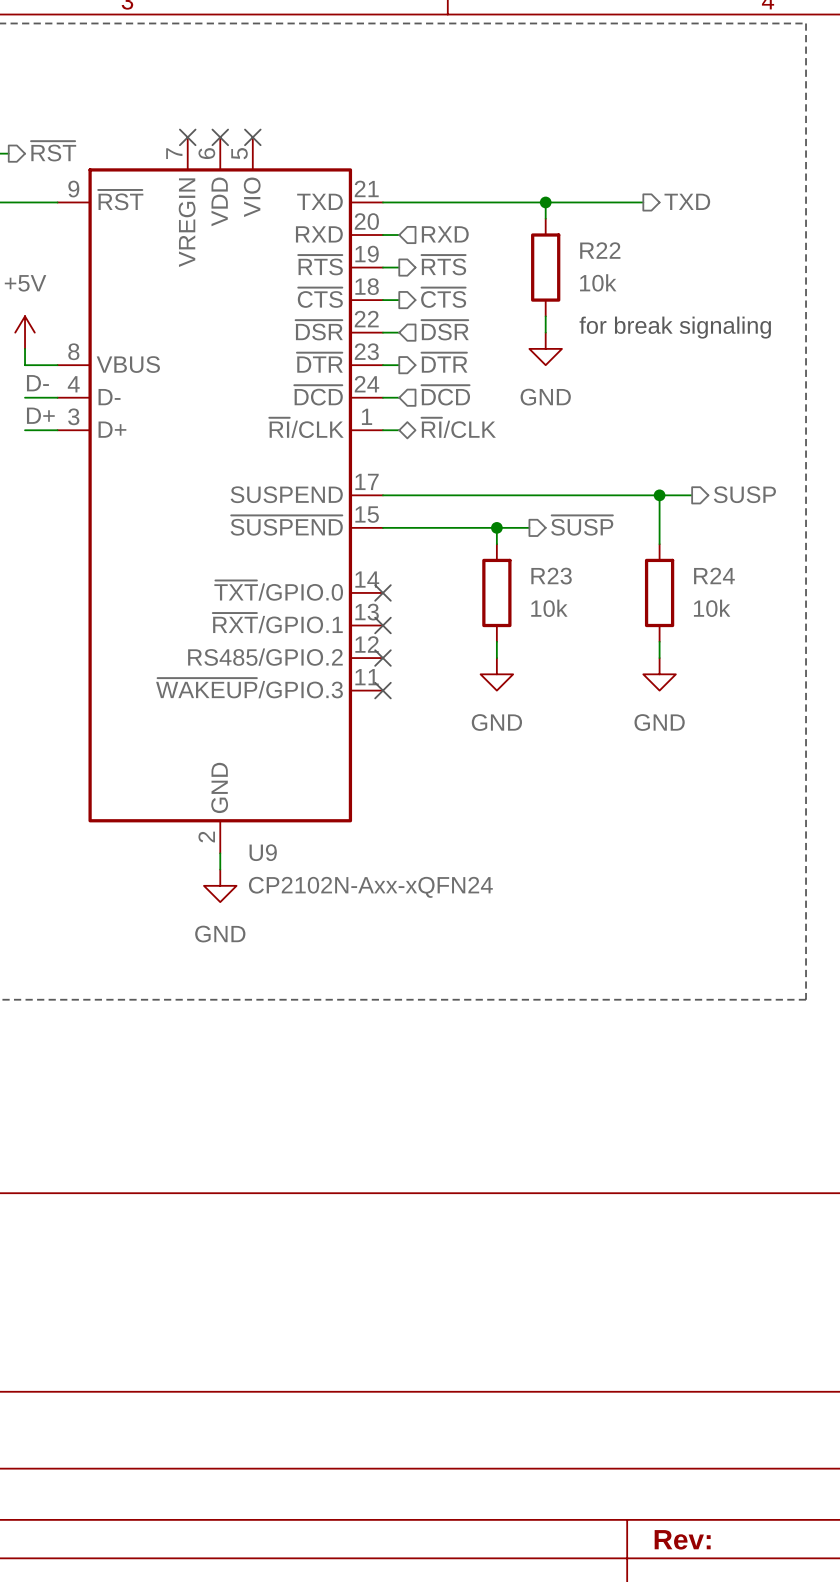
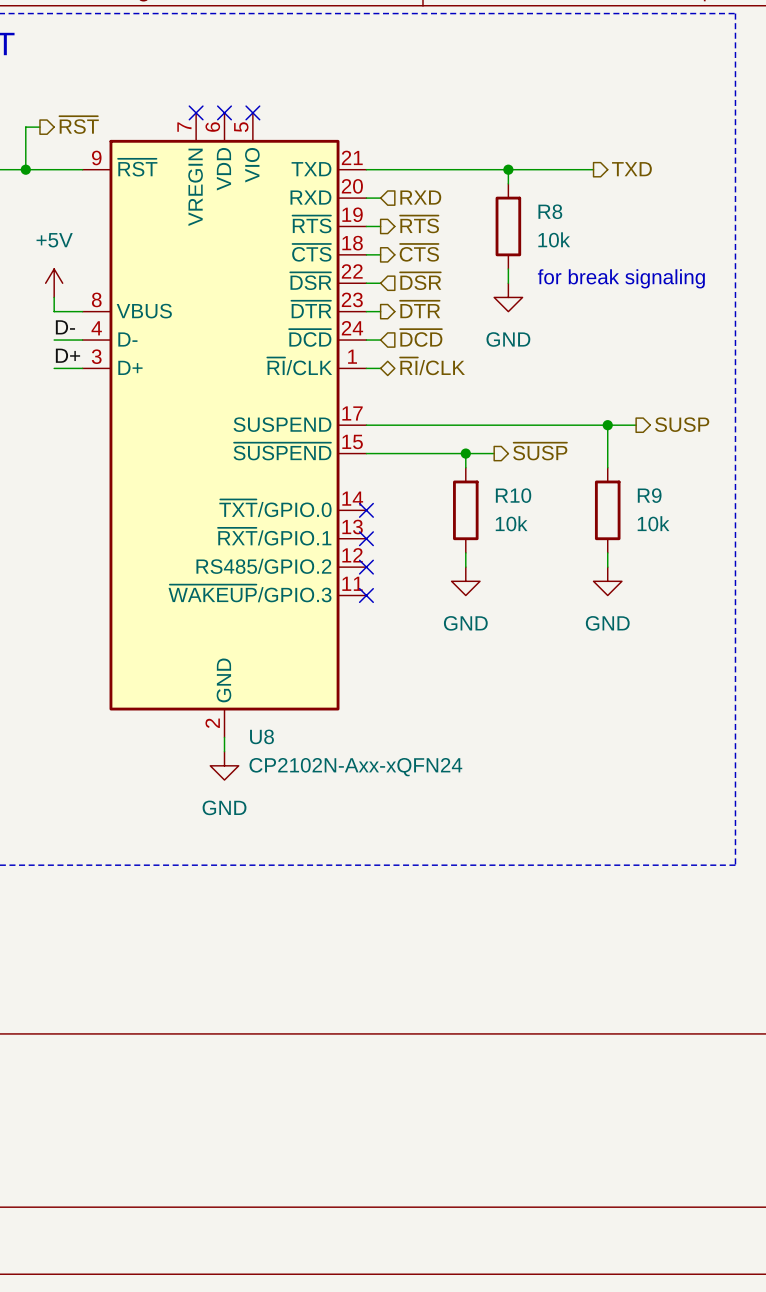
R22 name: R22 (600, 250) -> R8 (550, 211)
R24 name: R24 (714, 575) -> R9 (649, 495)
R23 name: R23 (551, 576) -> R10 (513, 495)
U9 name: U9 (263, 852) -> U8 (261, 736)

